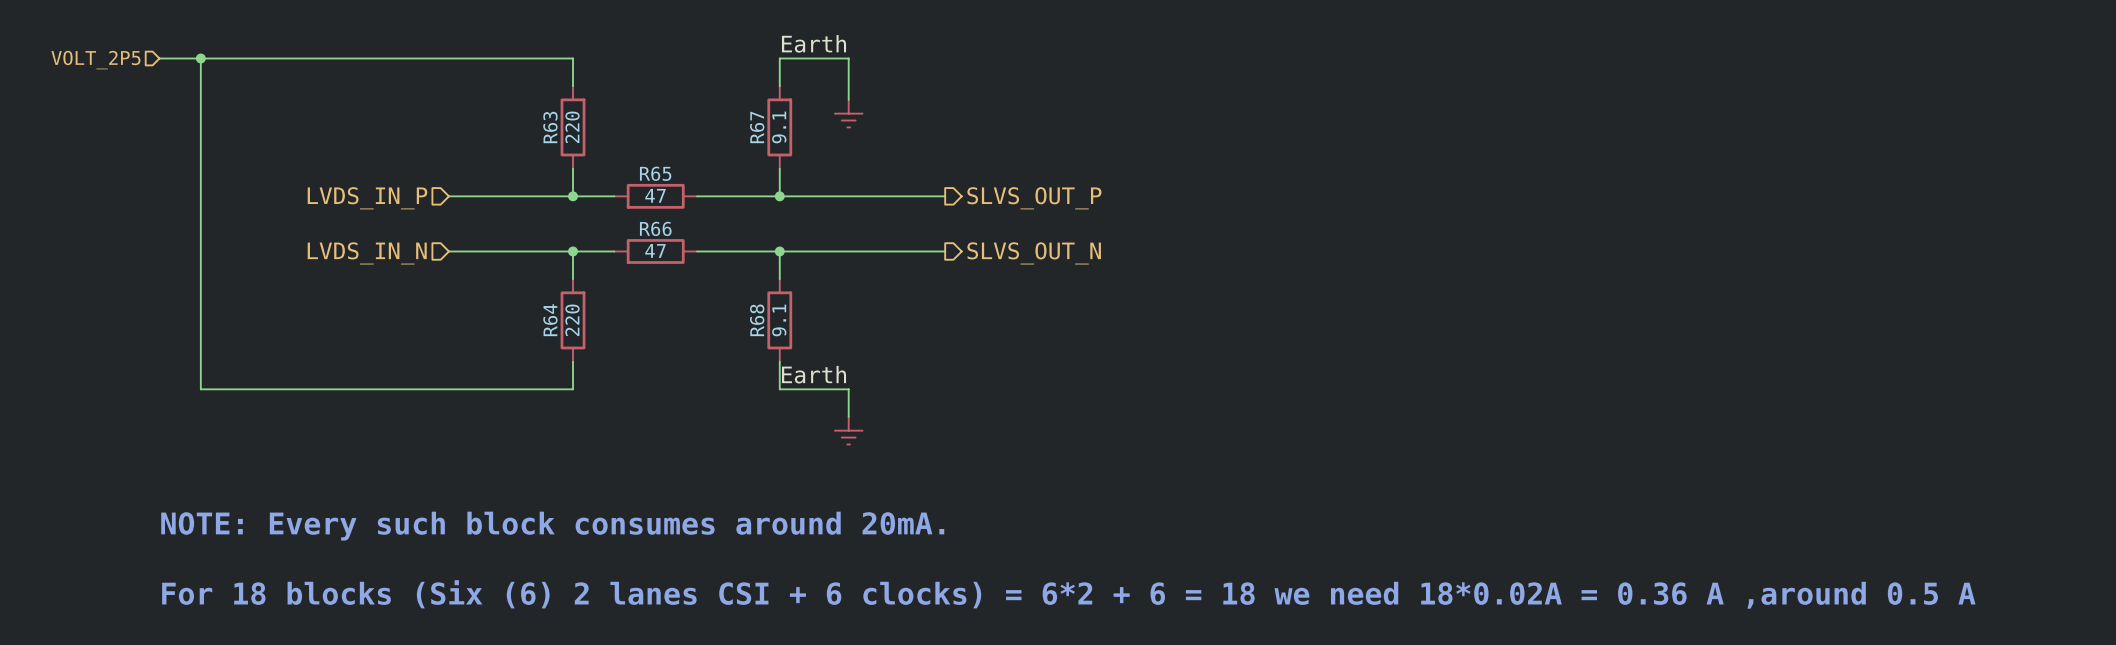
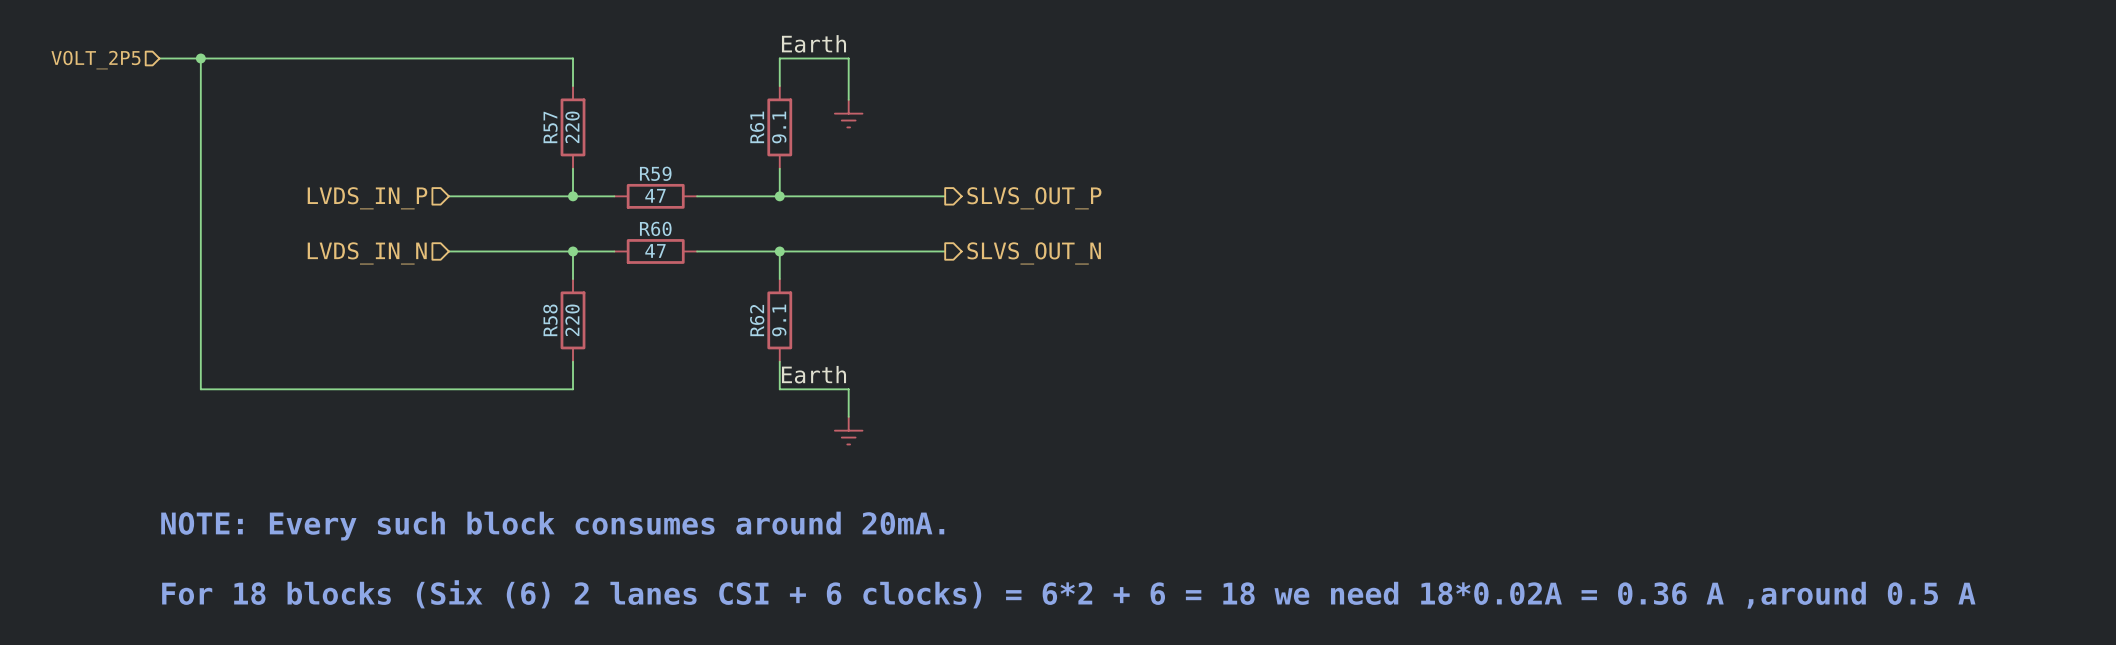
R63 name: R63 (550, 127) -> R57 (550, 127)
R67 name: R67 (757, 127) -> R61 (757, 127)
R65 name: R65 (655, 173) -> R59 (655, 173)
R66 name: R66 (655, 228) -> R60 (655, 228)
R64 name: R64 (550, 320) -> R58 (550, 320)
R68 name: R68 (757, 320) -> R62 (757, 320)

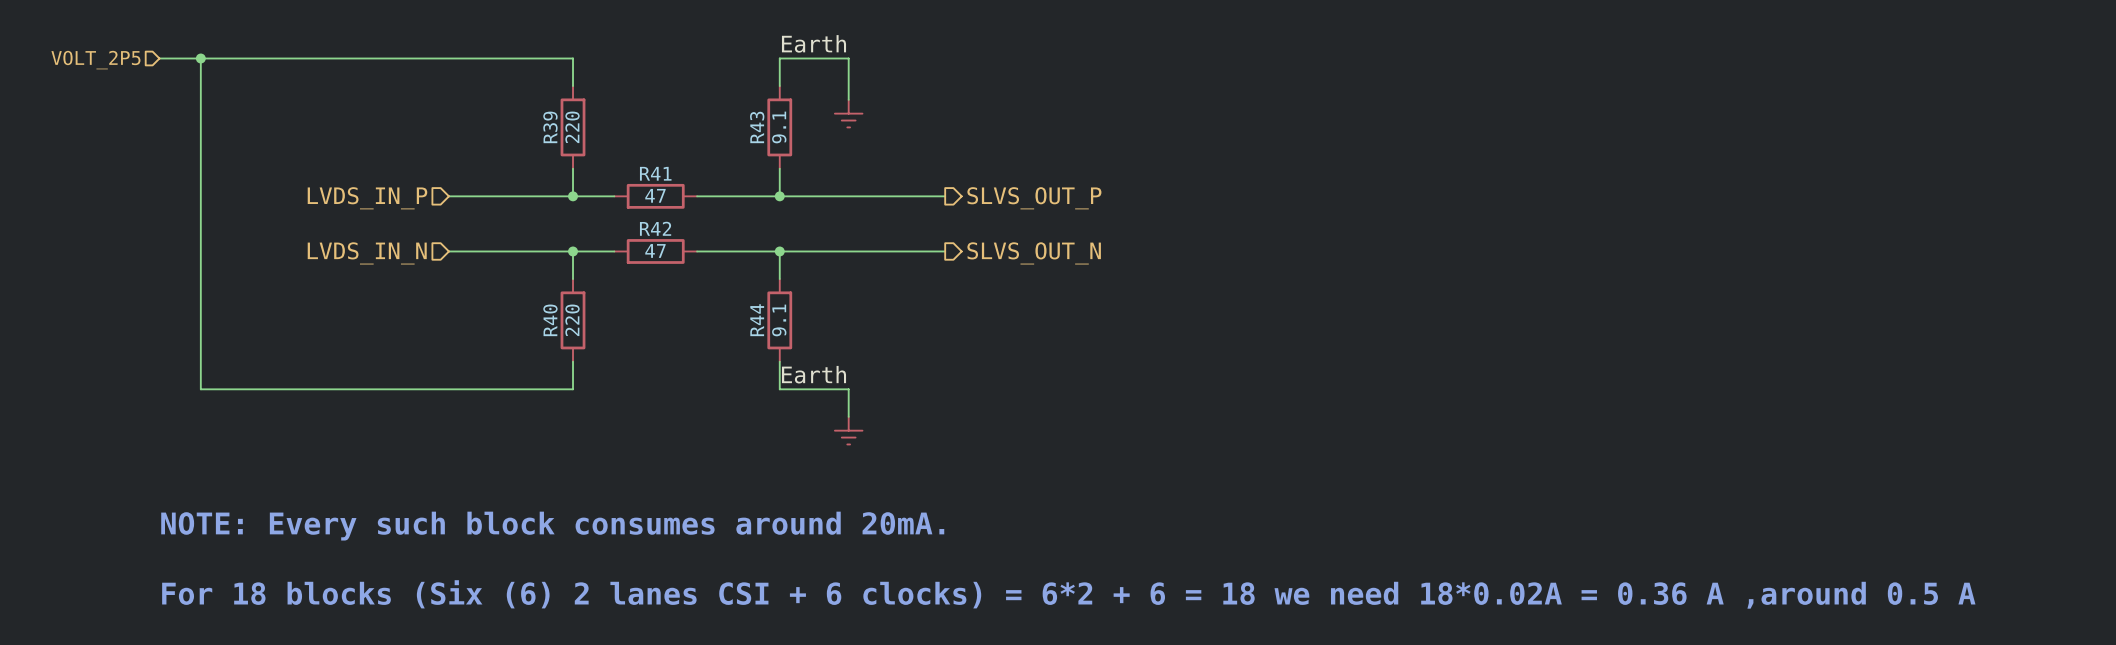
R57 name: R57 (550, 127) -> R39 (550, 127)
R61 name: R61 (757, 127) -> R43 (757, 127)
R59 name: R59 (655, 173) -> R41 (655, 173)
R60 name: R60 (655, 228) -> R42 (655, 228)
R58 name: R58 (550, 320) -> R40 (550, 320)
R62 name: R62 (757, 320) -> R44 (757, 320)

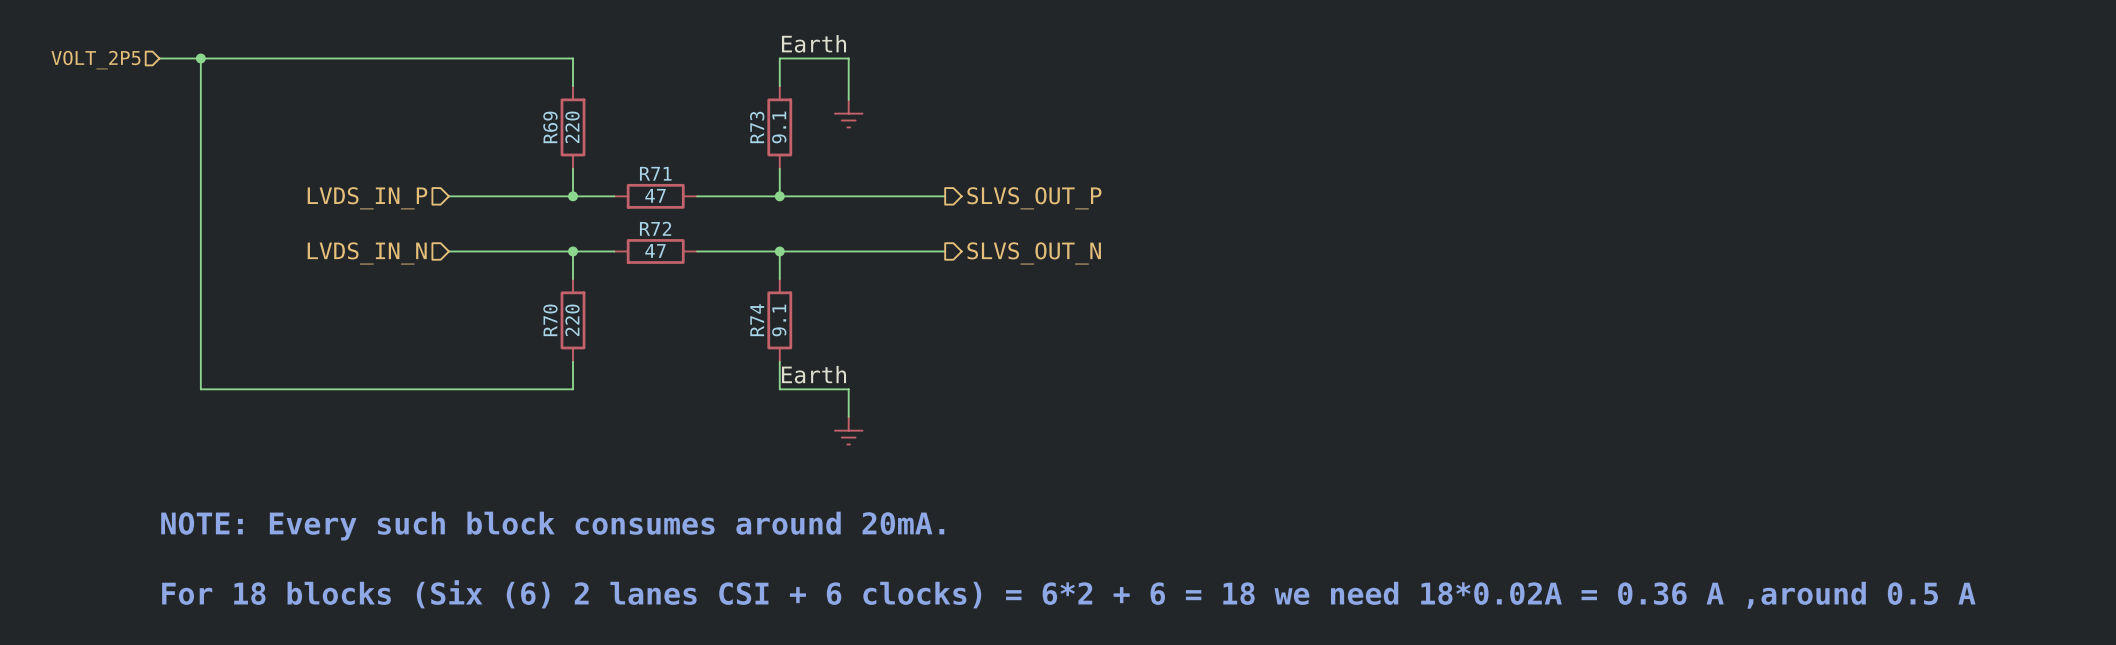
R39 name: R39 (550, 127) -> R69 (550, 127)
R43 name: R43 (757, 127) -> R73 (757, 127)
R41 name: R41 (655, 173) -> R71 (655, 173)
R42 name: R42 (655, 228) -> R72 (655, 228)
R40 name: R40 (550, 320) -> R70 (550, 320)
R44 name: R44 (757, 320) -> R74 (757, 320)

